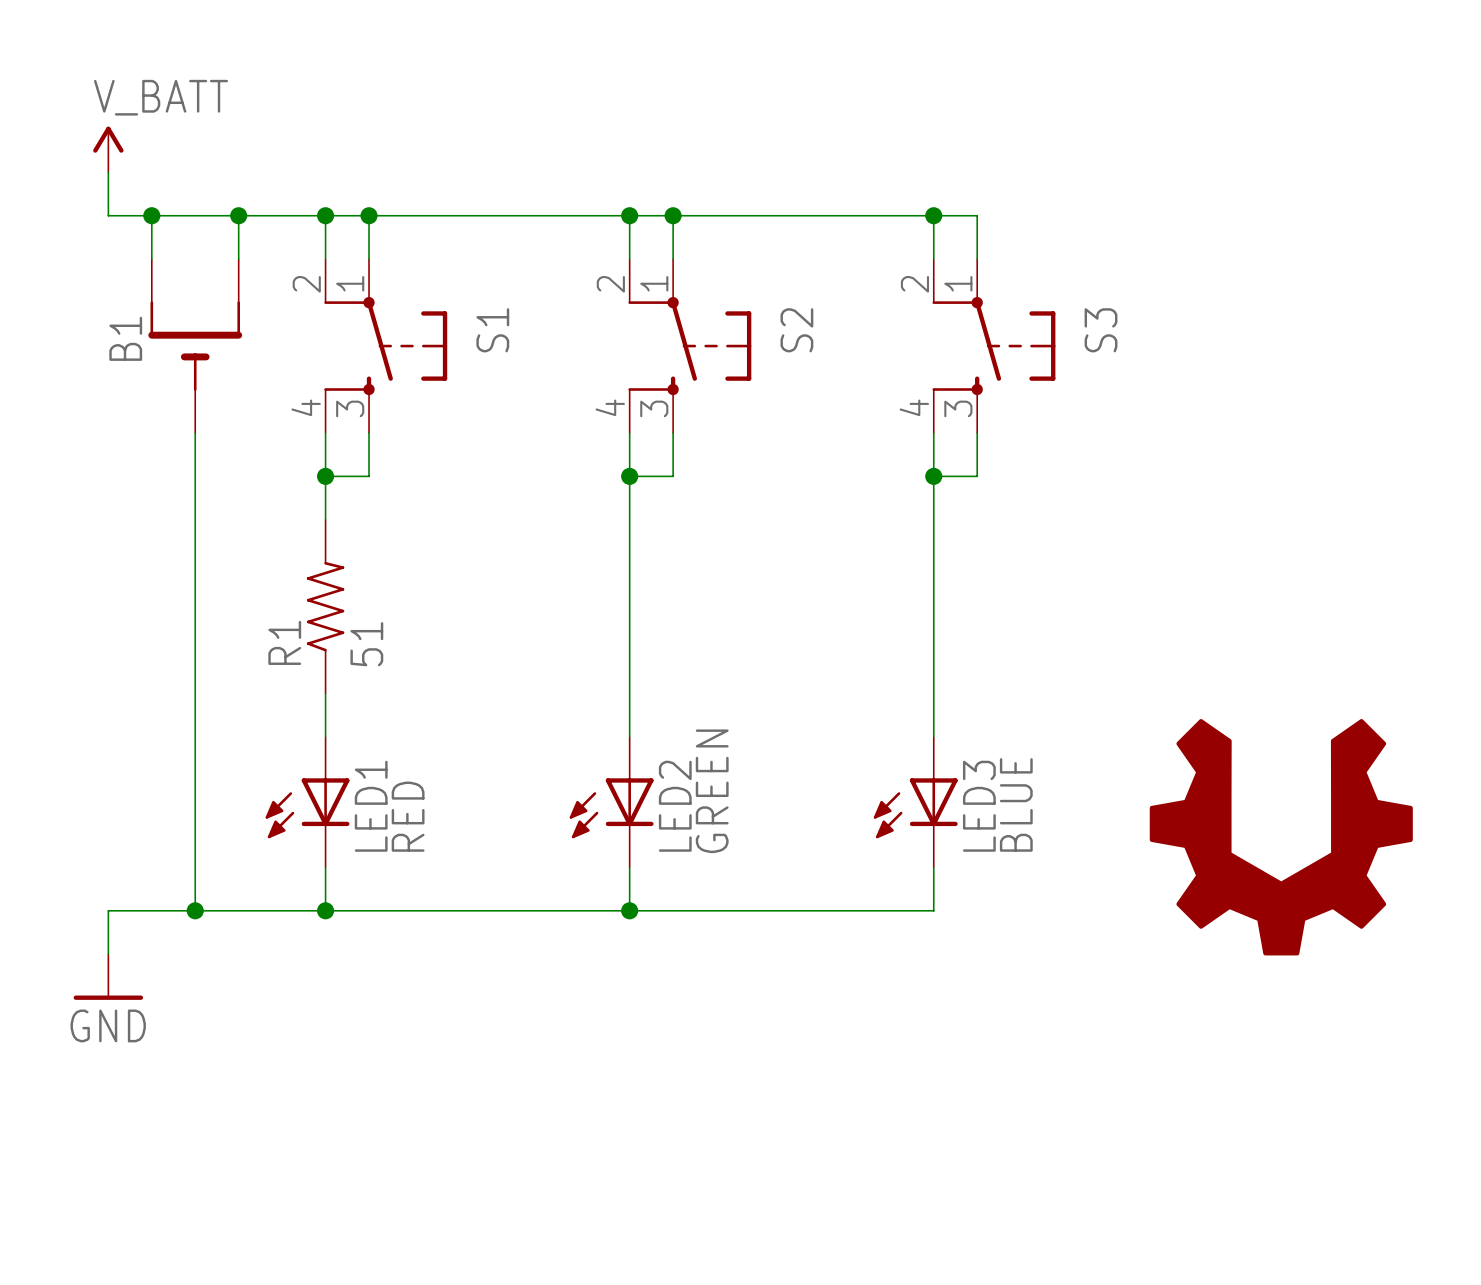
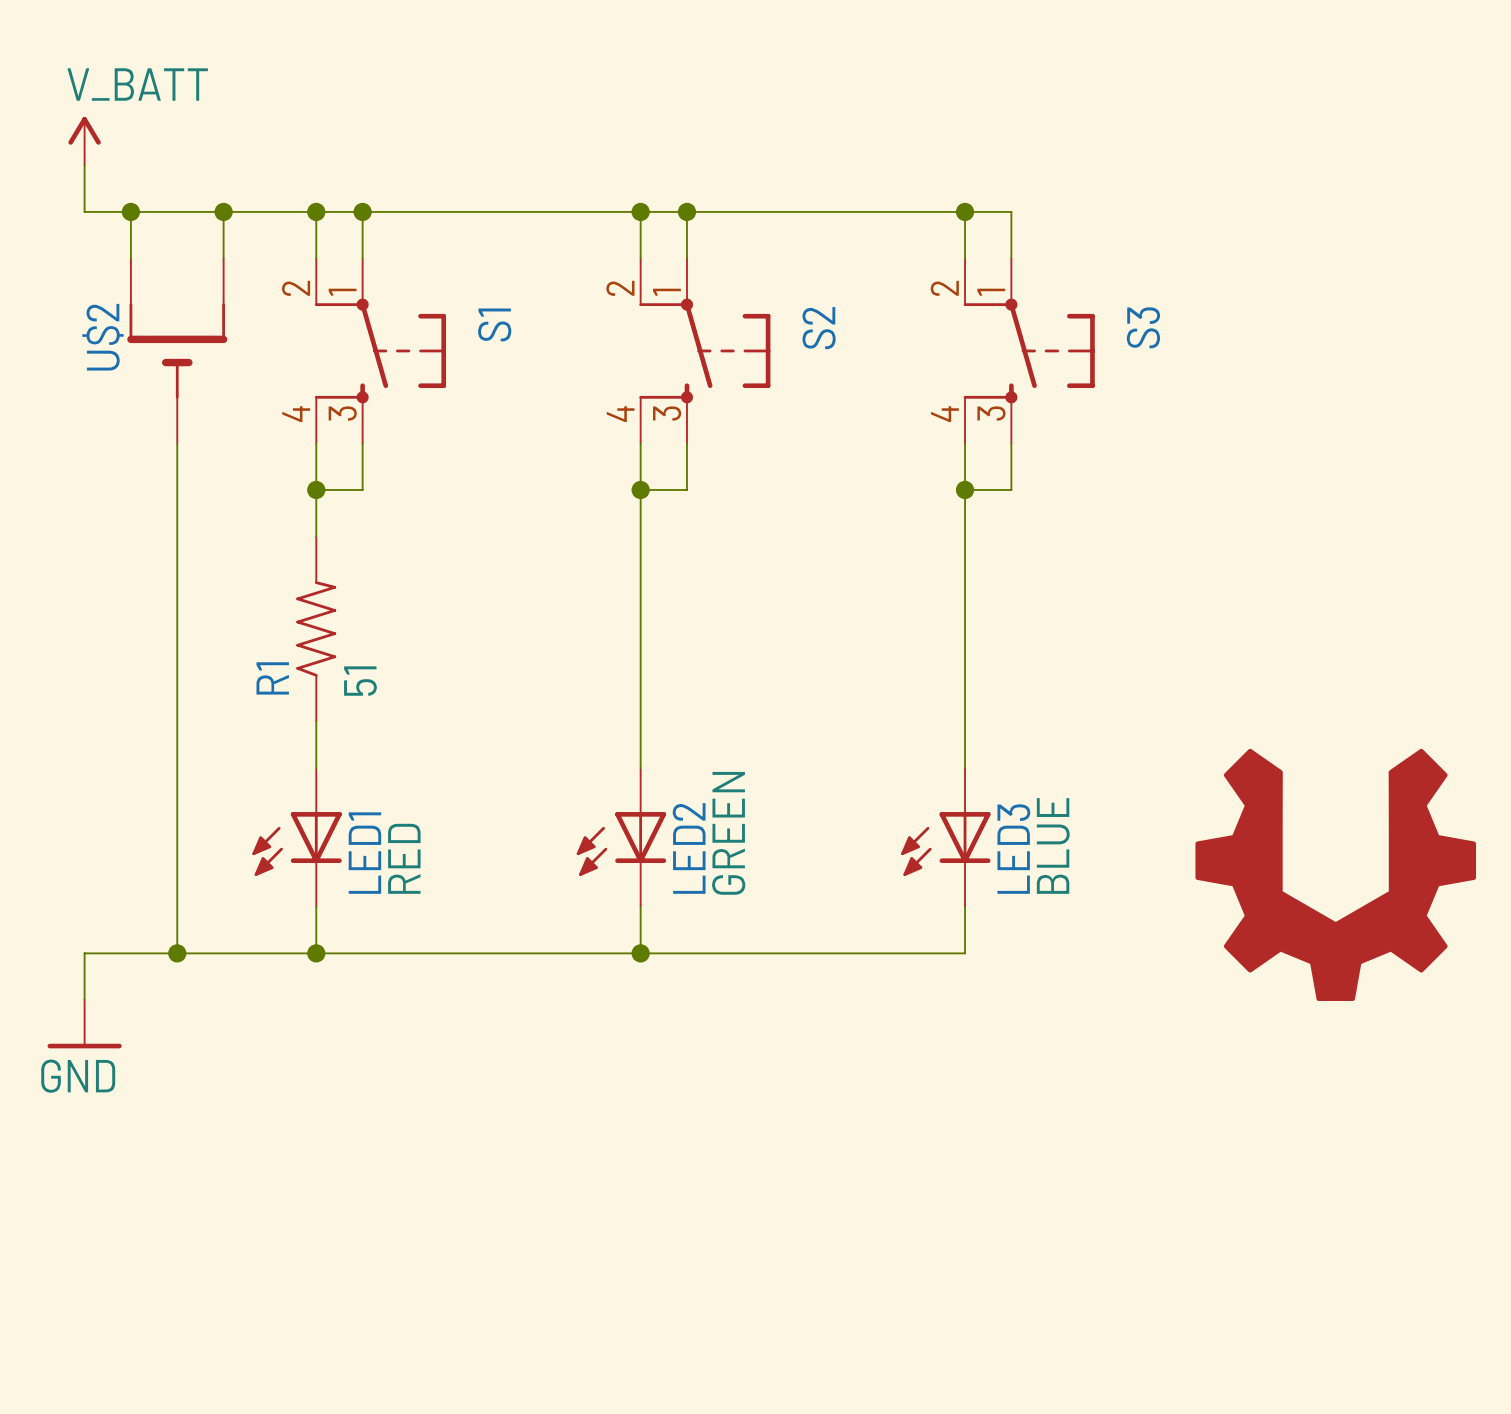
B1 name: B1 (125, 338) -> U$2 (102, 337)

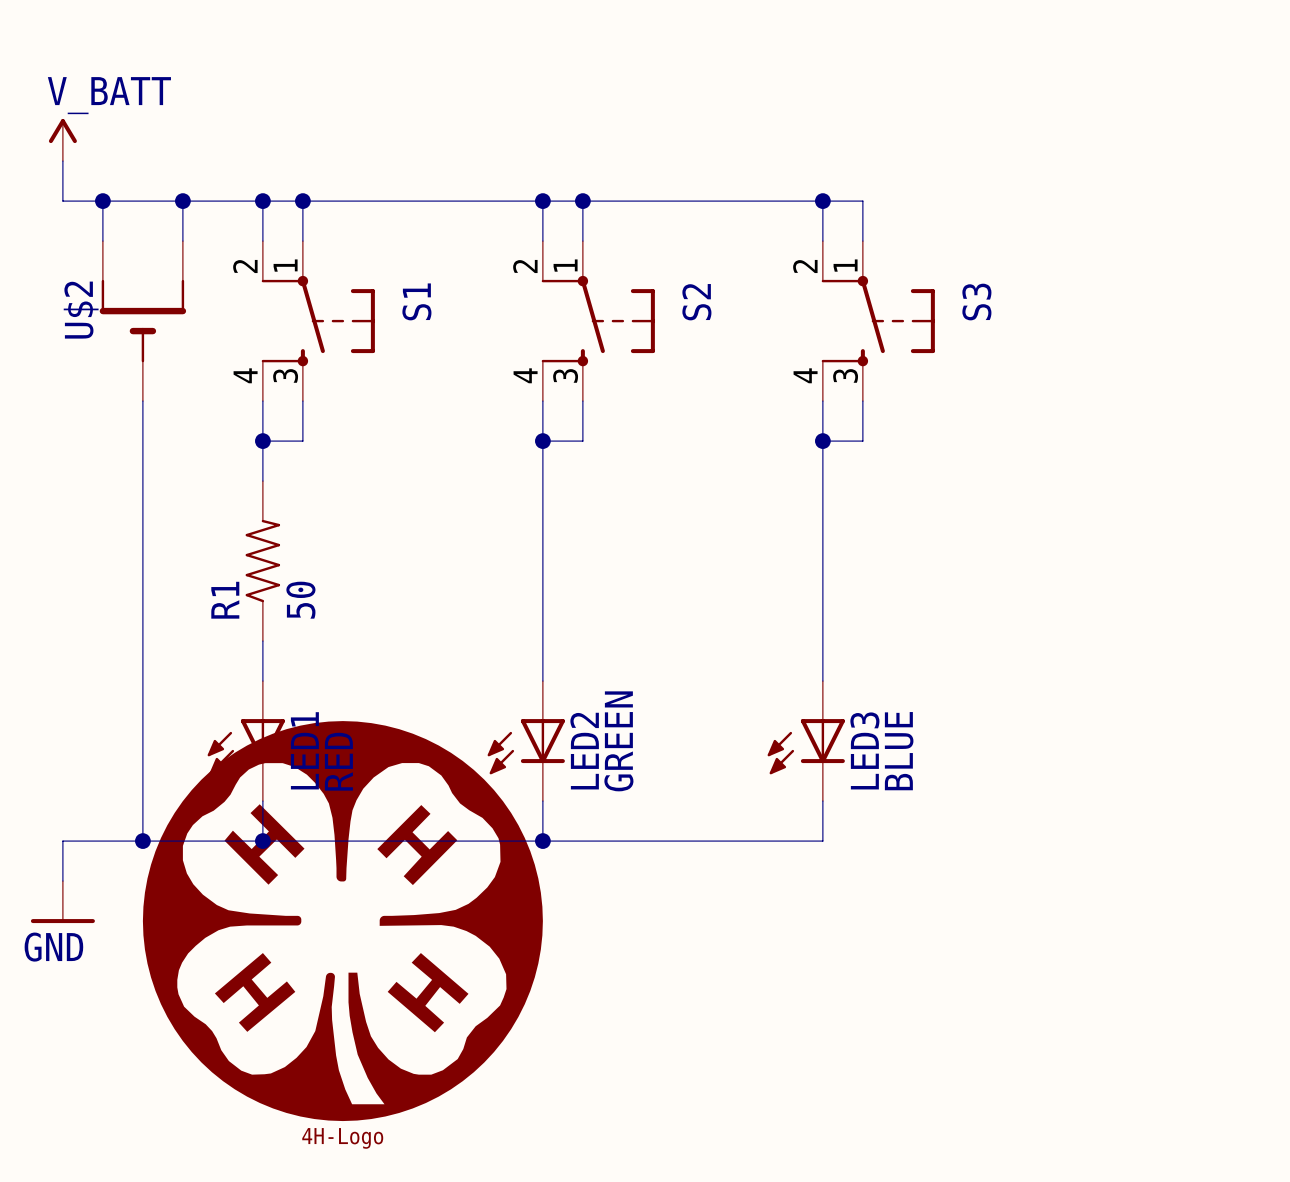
R1 value: 51 (360, 681) -> 50 (300, 600)
part: (1335, 874) -> none
part: none -> (342, 921)

